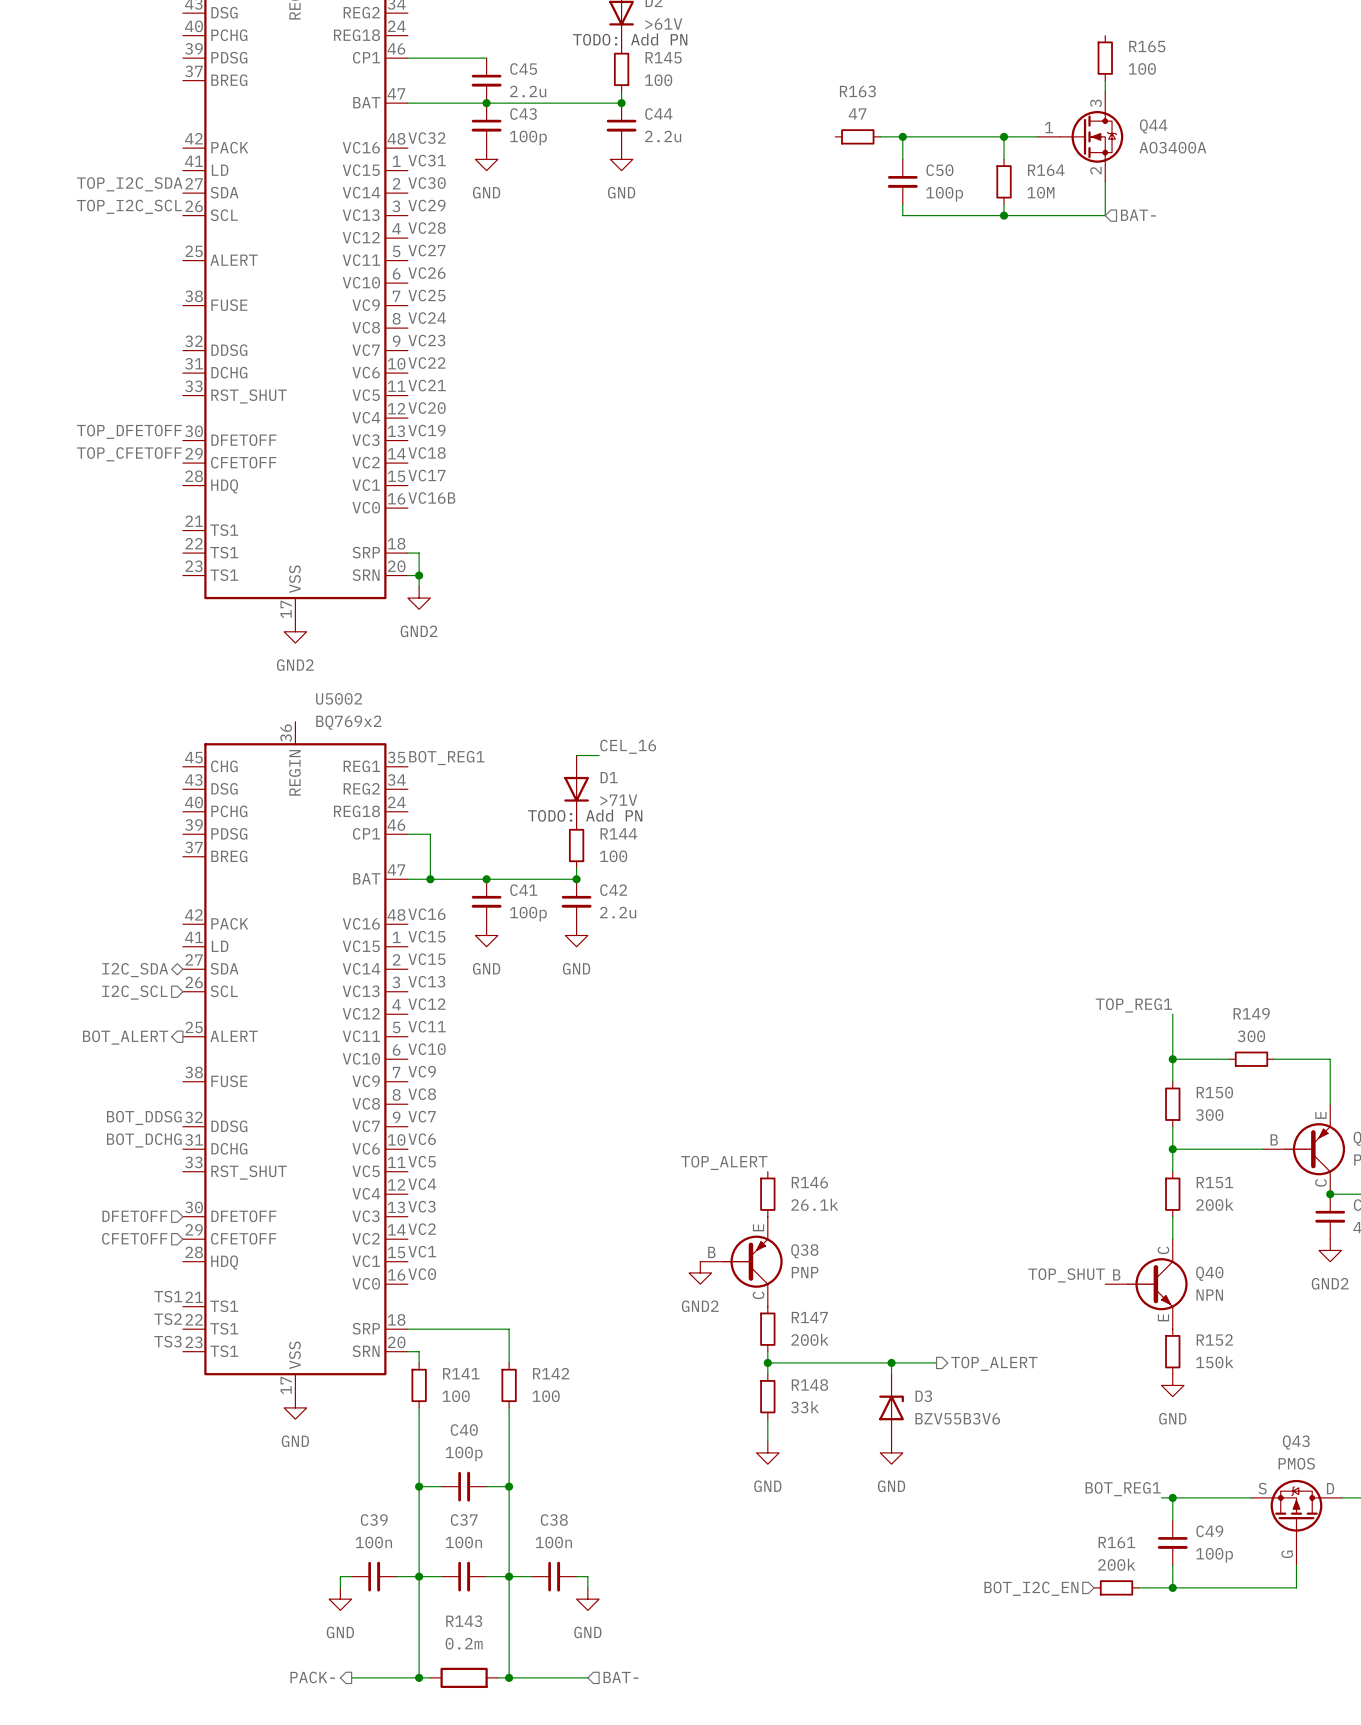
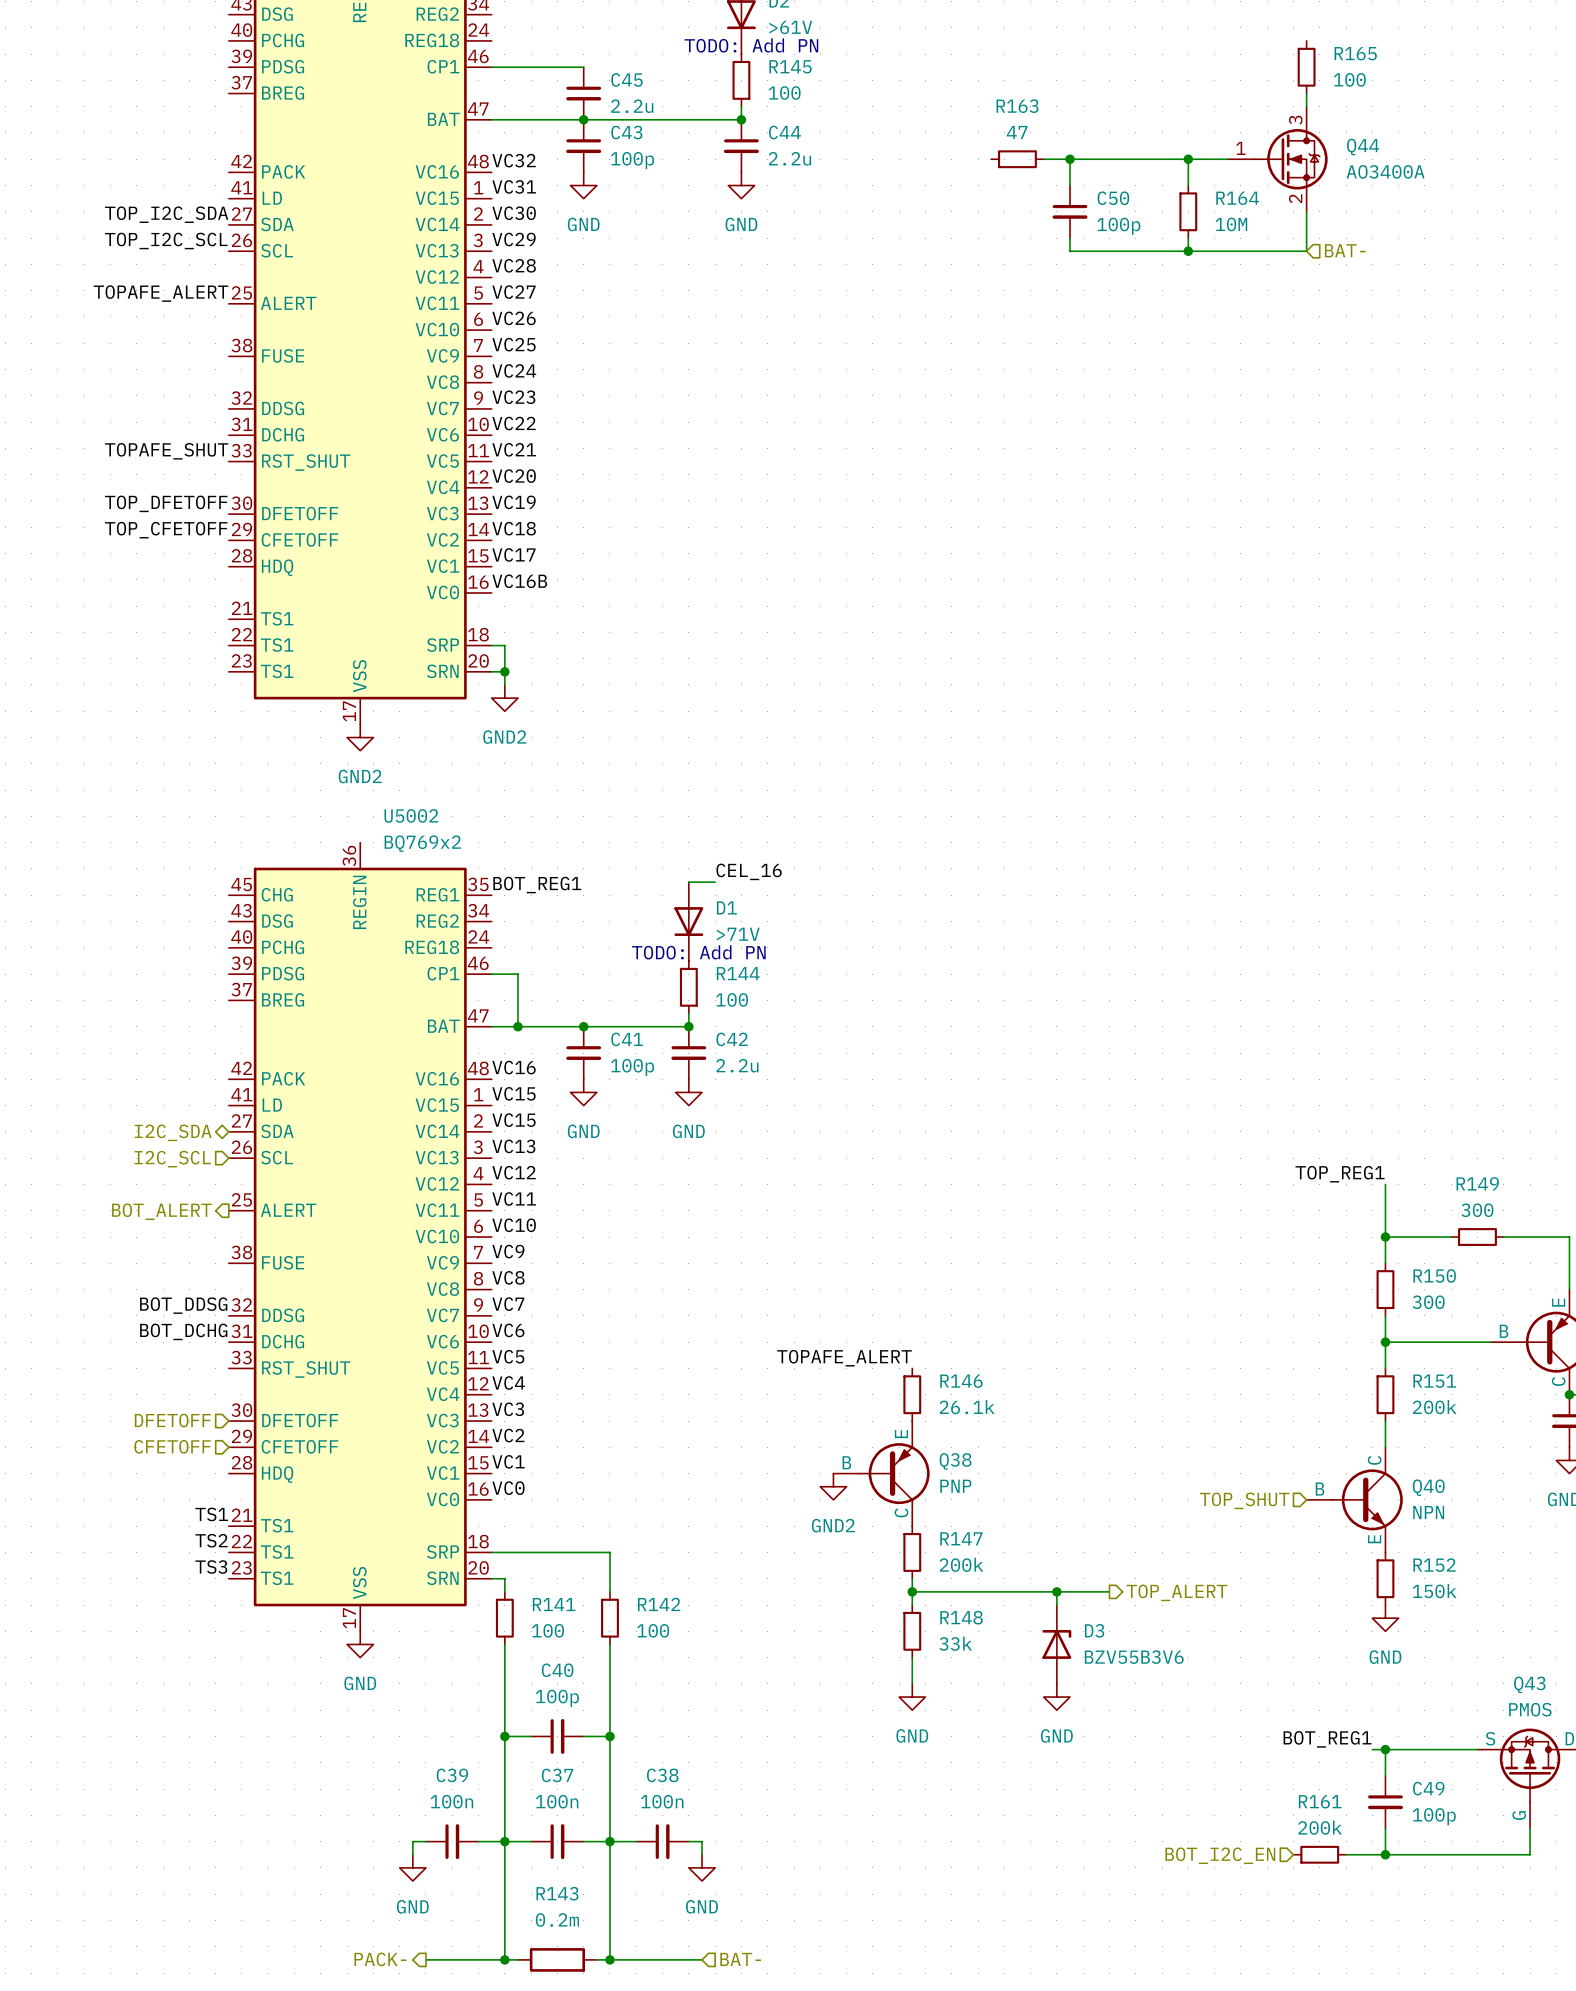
label: none -> TOPAFE_ALERT (161, 293)
label: none -> TOPAFE_SHUT (166, 451)
label: TOP_ALERT (724, 1162) -> TOPAFE_ALERT (844, 1358)
label: TOP_SHUT (1066, 1275) -> none
hierarchical label: none -> TOP_SHUT (1244, 1500)

